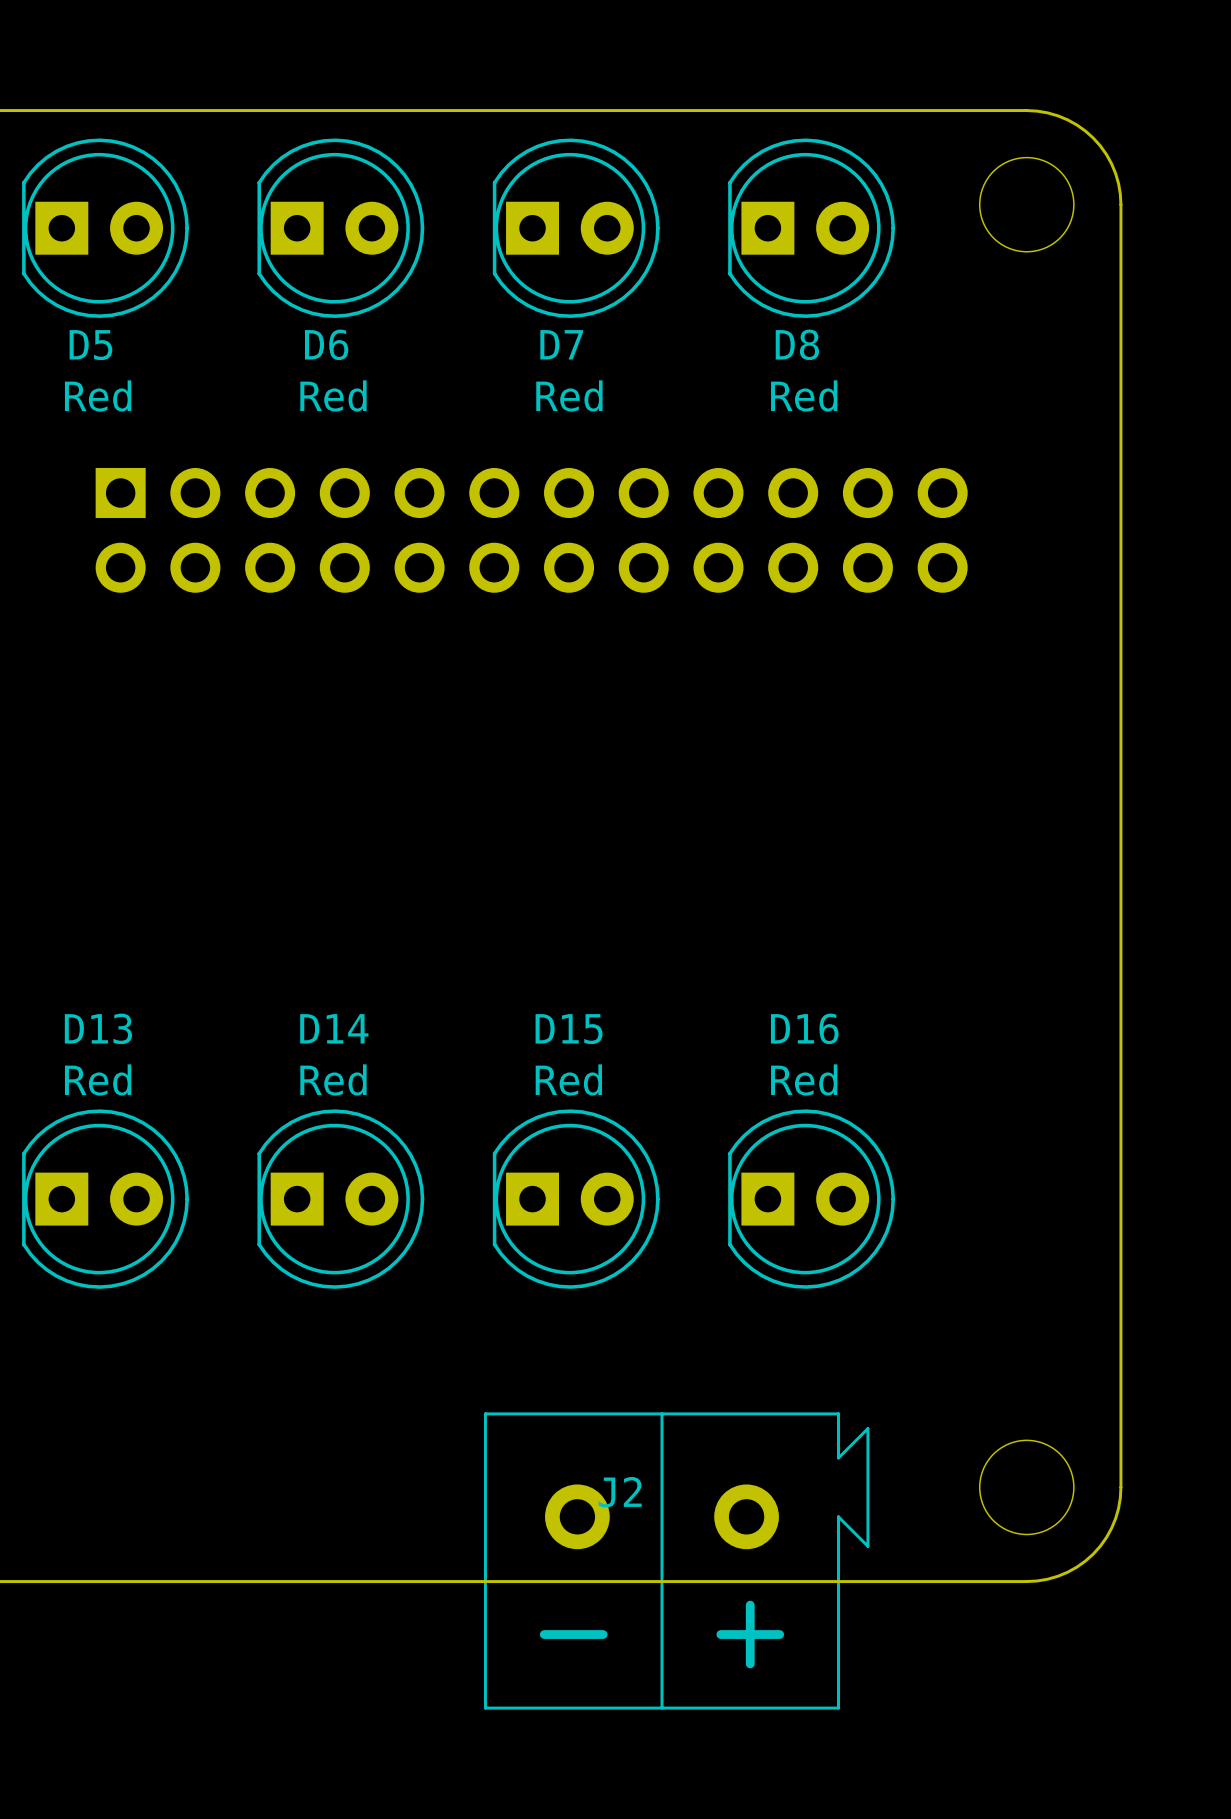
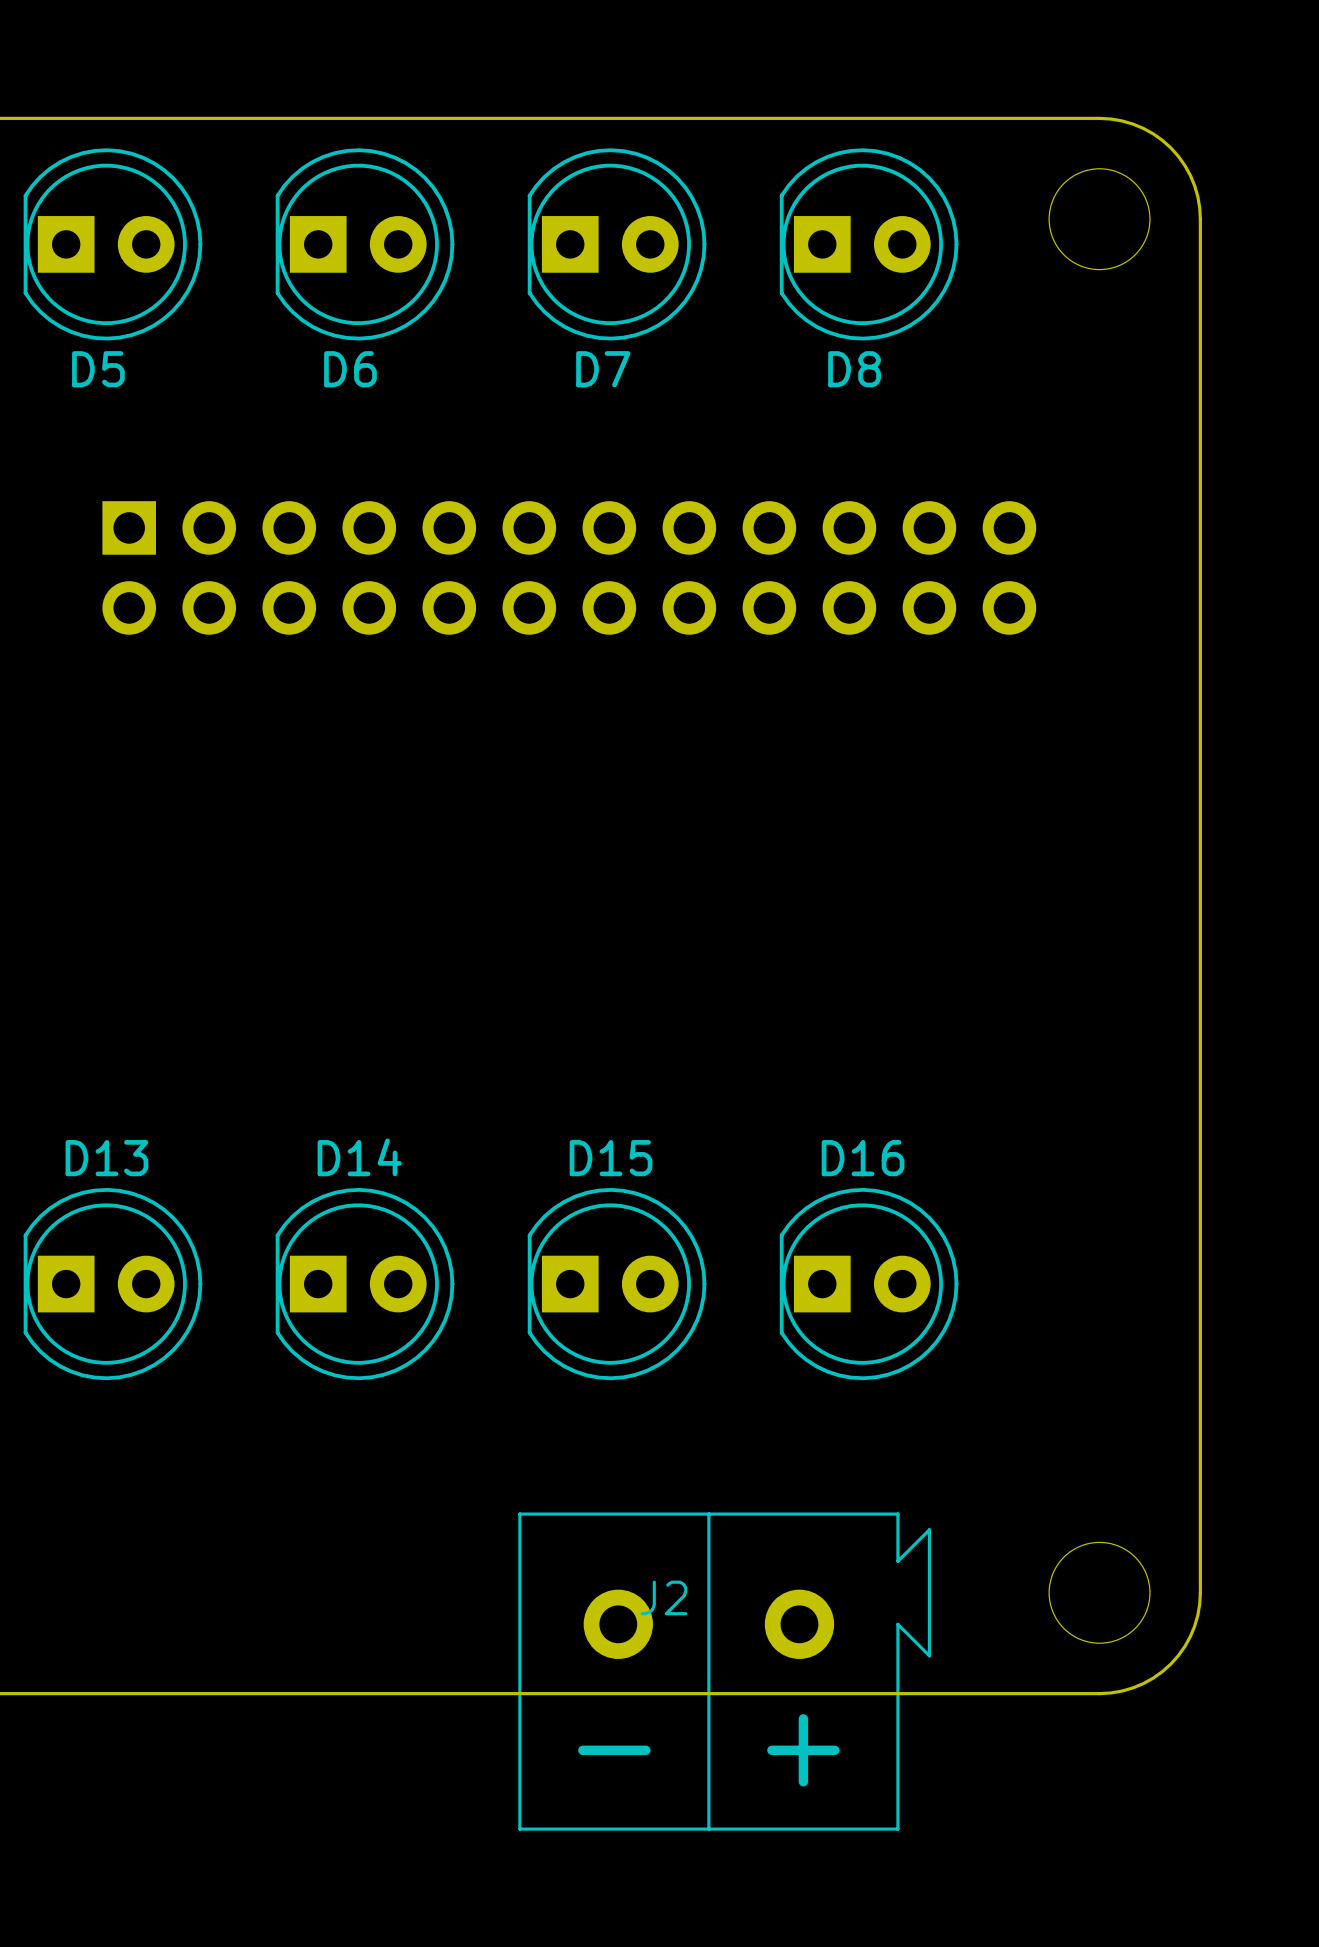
D5 value: Red (98, 395) -> none
D6 value: Red (333, 395) -> none
D7 value: Red (569, 395) -> none
D8 value: Red (804, 395) -> none
D13 name position: D13 (98, 1028) -> D13 (106, 1158)
D14 name position: D14 (334, 1028) -> D14 (359, 1157)
D16 name position: D16 (804, 1028) -> D16 (863, 1158)
D15 name position: D15 (569, 1029) -> D15 (611, 1158)
D13 value: Red (98, 1079) -> none
D14 value: Red (333, 1079) -> none
D15 value: Red (568, 1079) -> none
D16 value: Red (804, 1079) -> none

